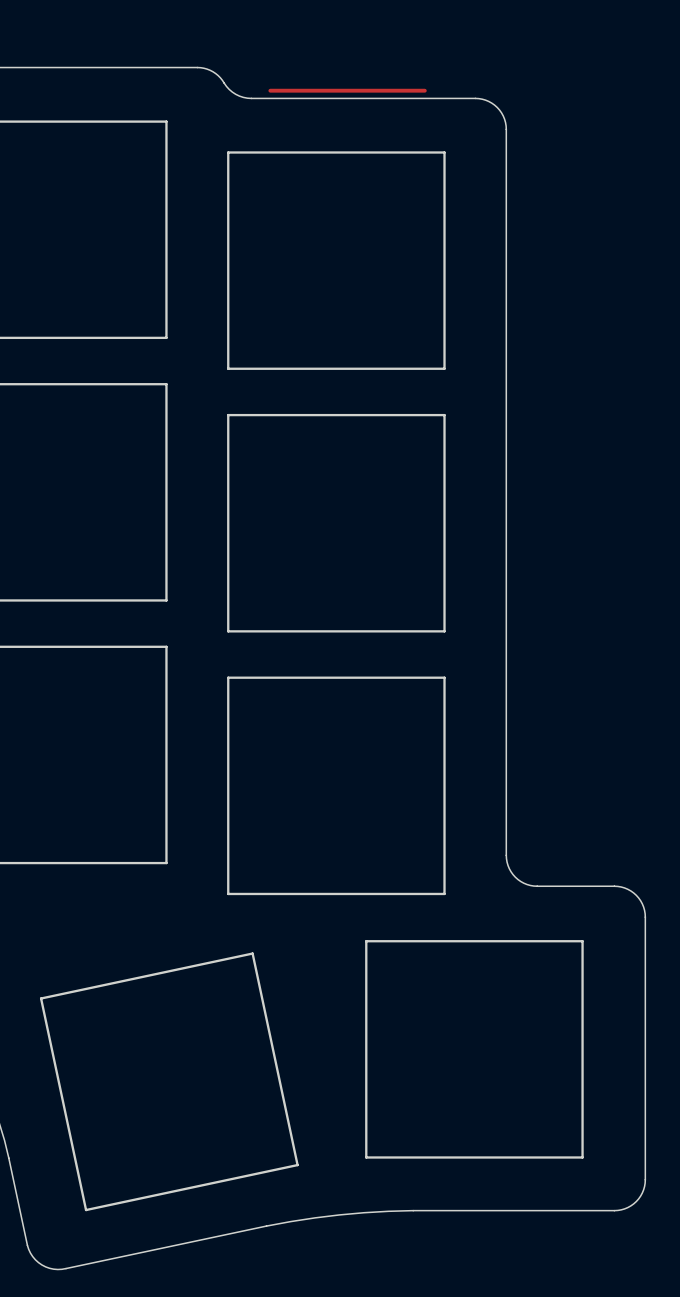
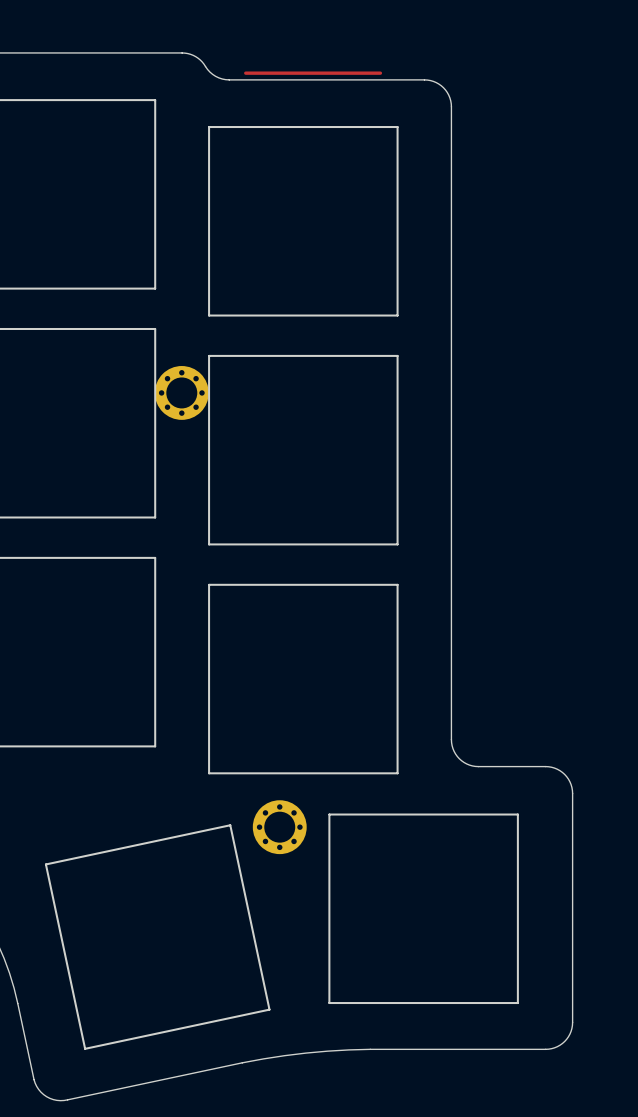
part: none -> (181, 392)
part: none -> (279, 827)

